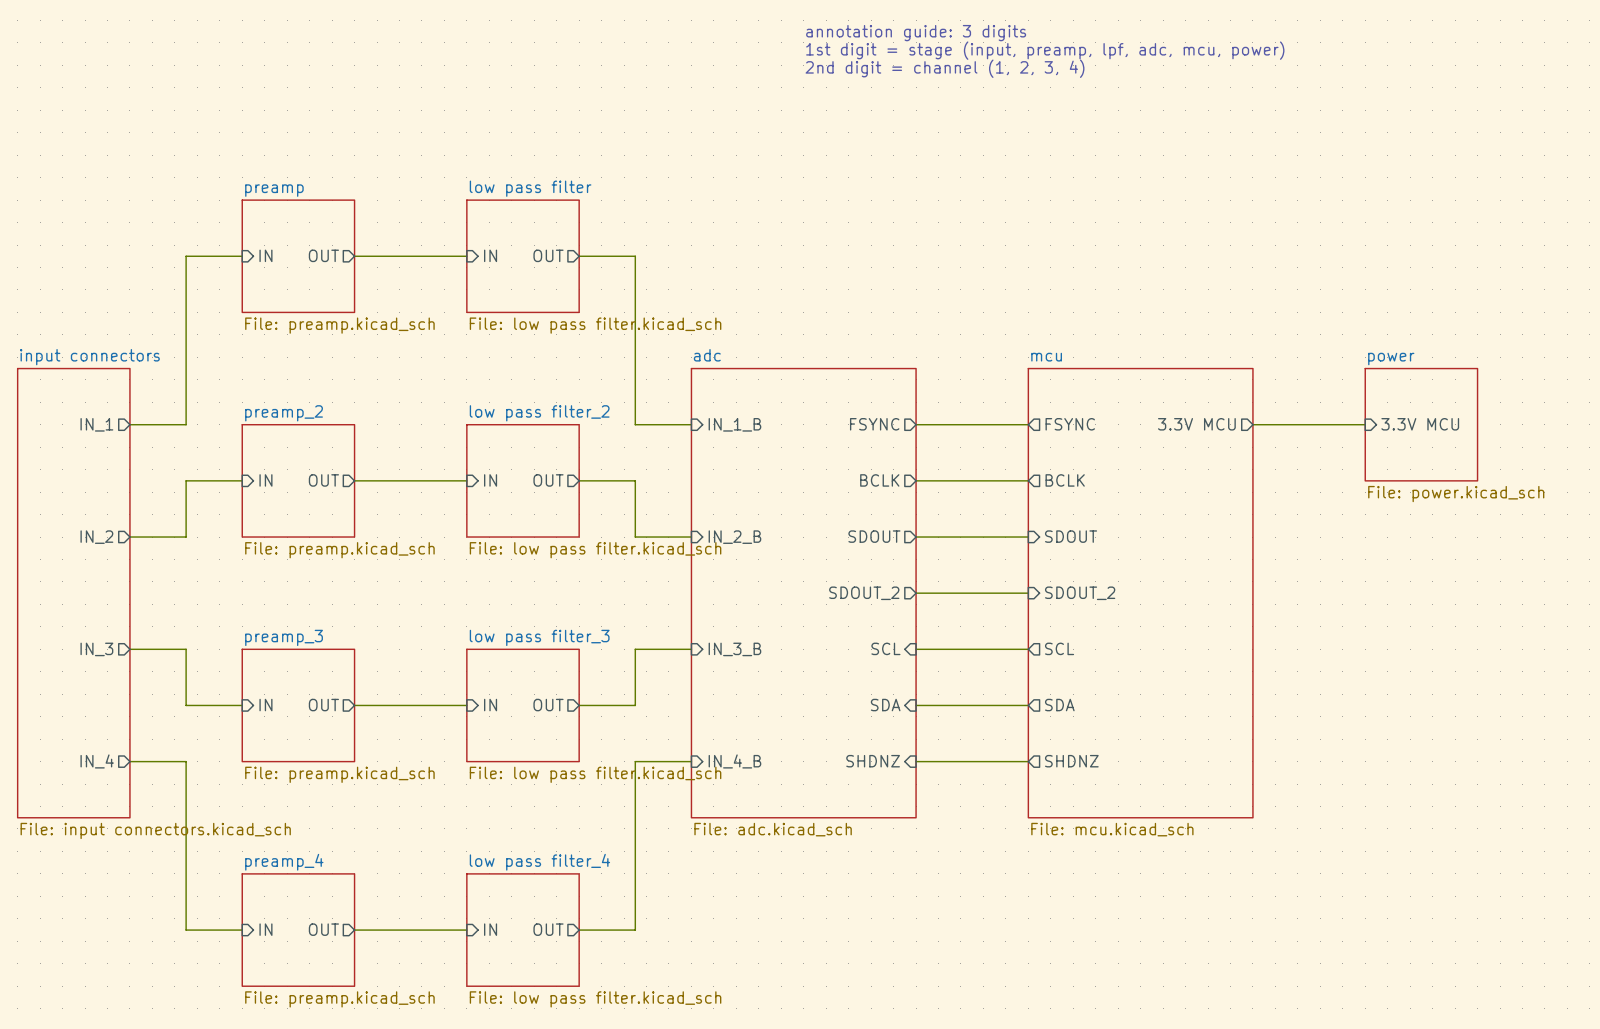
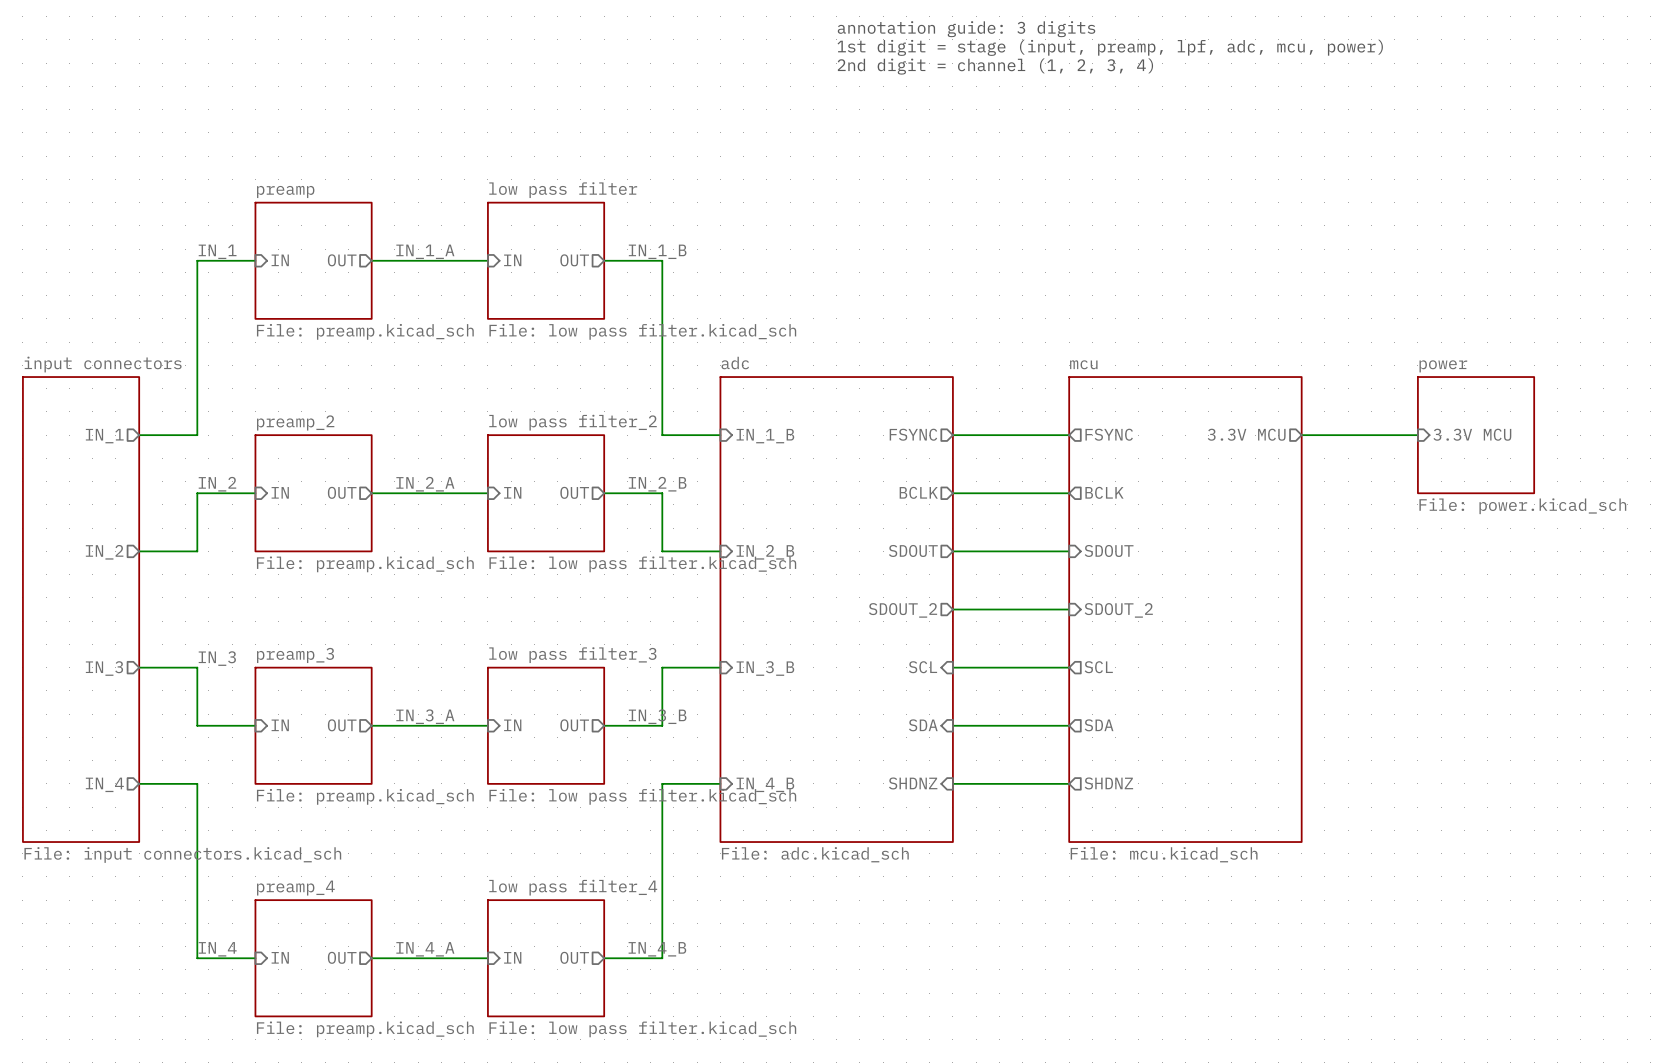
label: none -> IN_1 (217, 251)
label: none -> IN_1_A (425, 251)
label: none -> IN_1_B (657, 251)
label: none -> IN_2 (217, 484)
label: none -> IN_2_A (425, 484)
label: none -> IN_2_B (657, 484)
label: none -> IN_3 (217, 658)
label: none -> IN_3_A (425, 716)
label: none -> IN_3_B (657, 716)
label: none -> IN_4 (217, 949)
label: none -> IN_4_A (425, 949)
label: none -> IN_4_B (657, 949)

